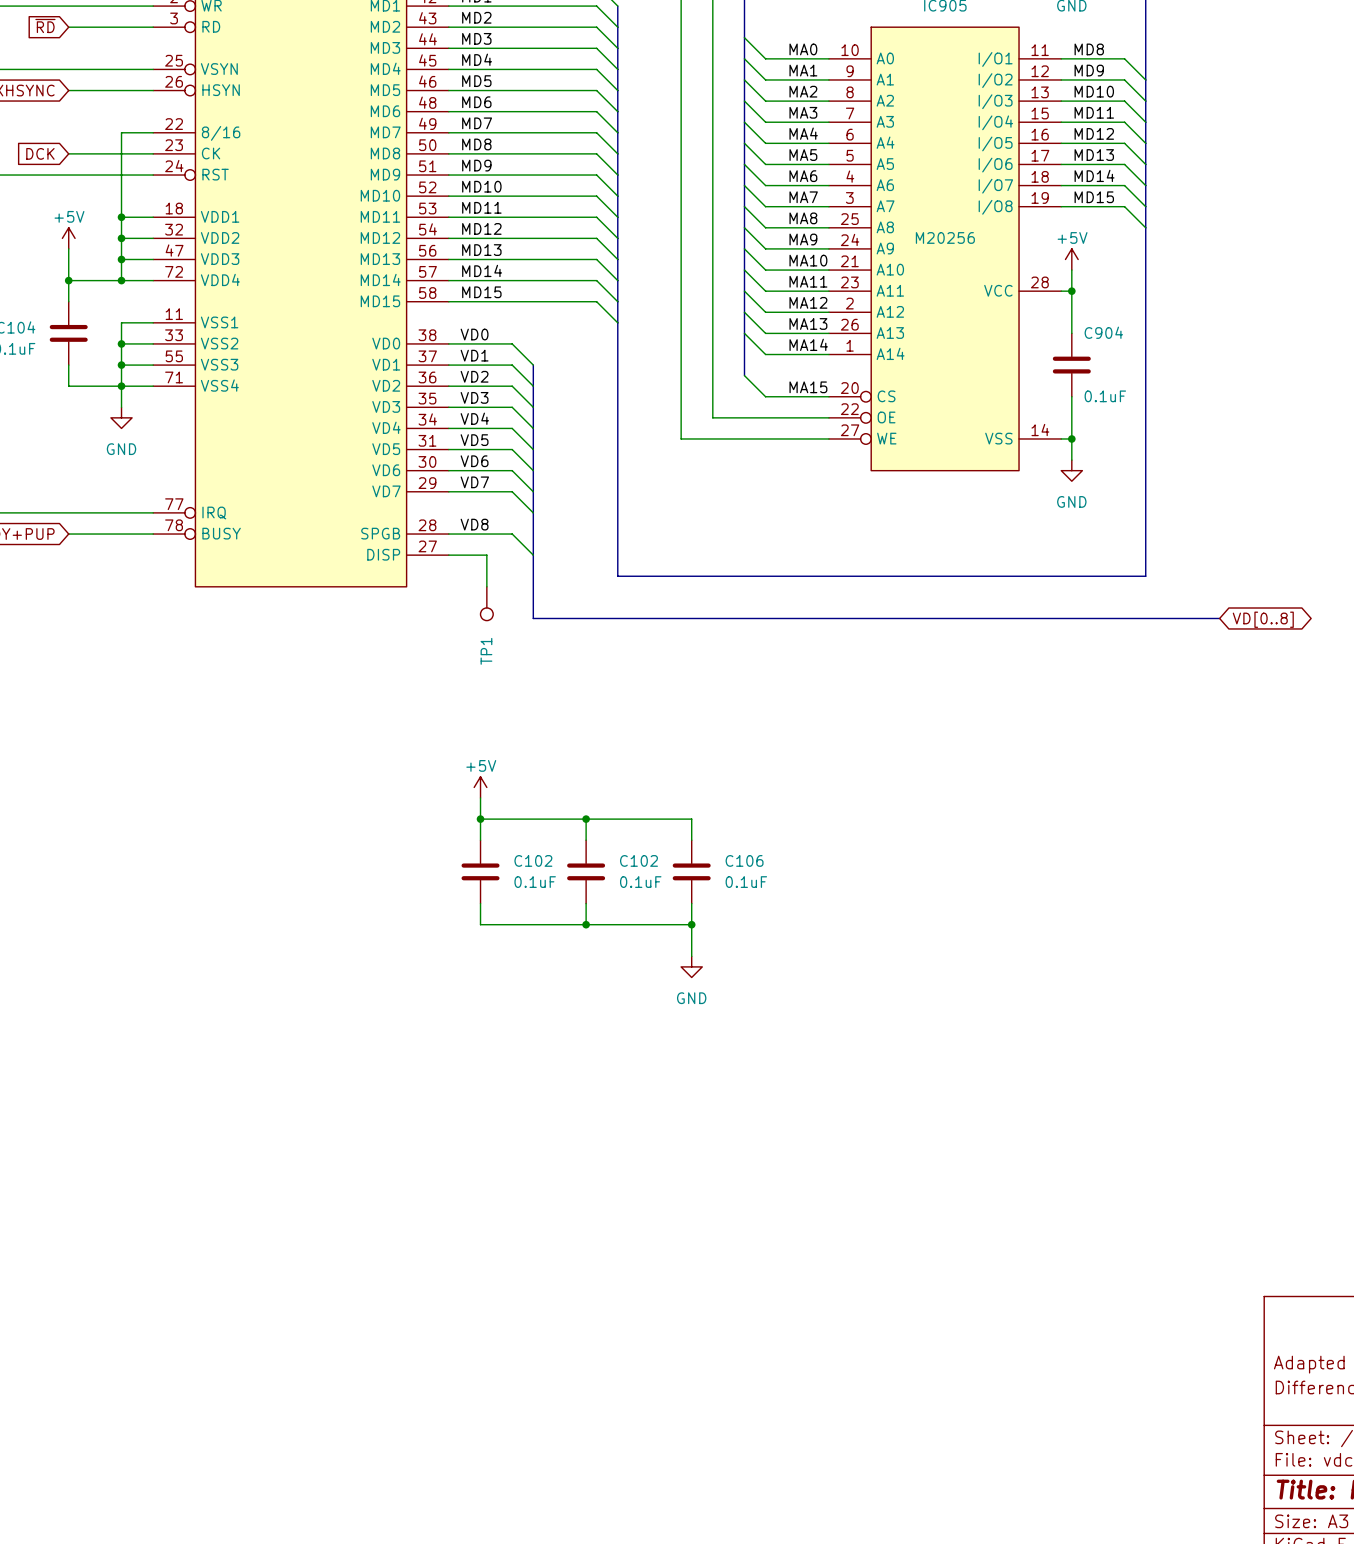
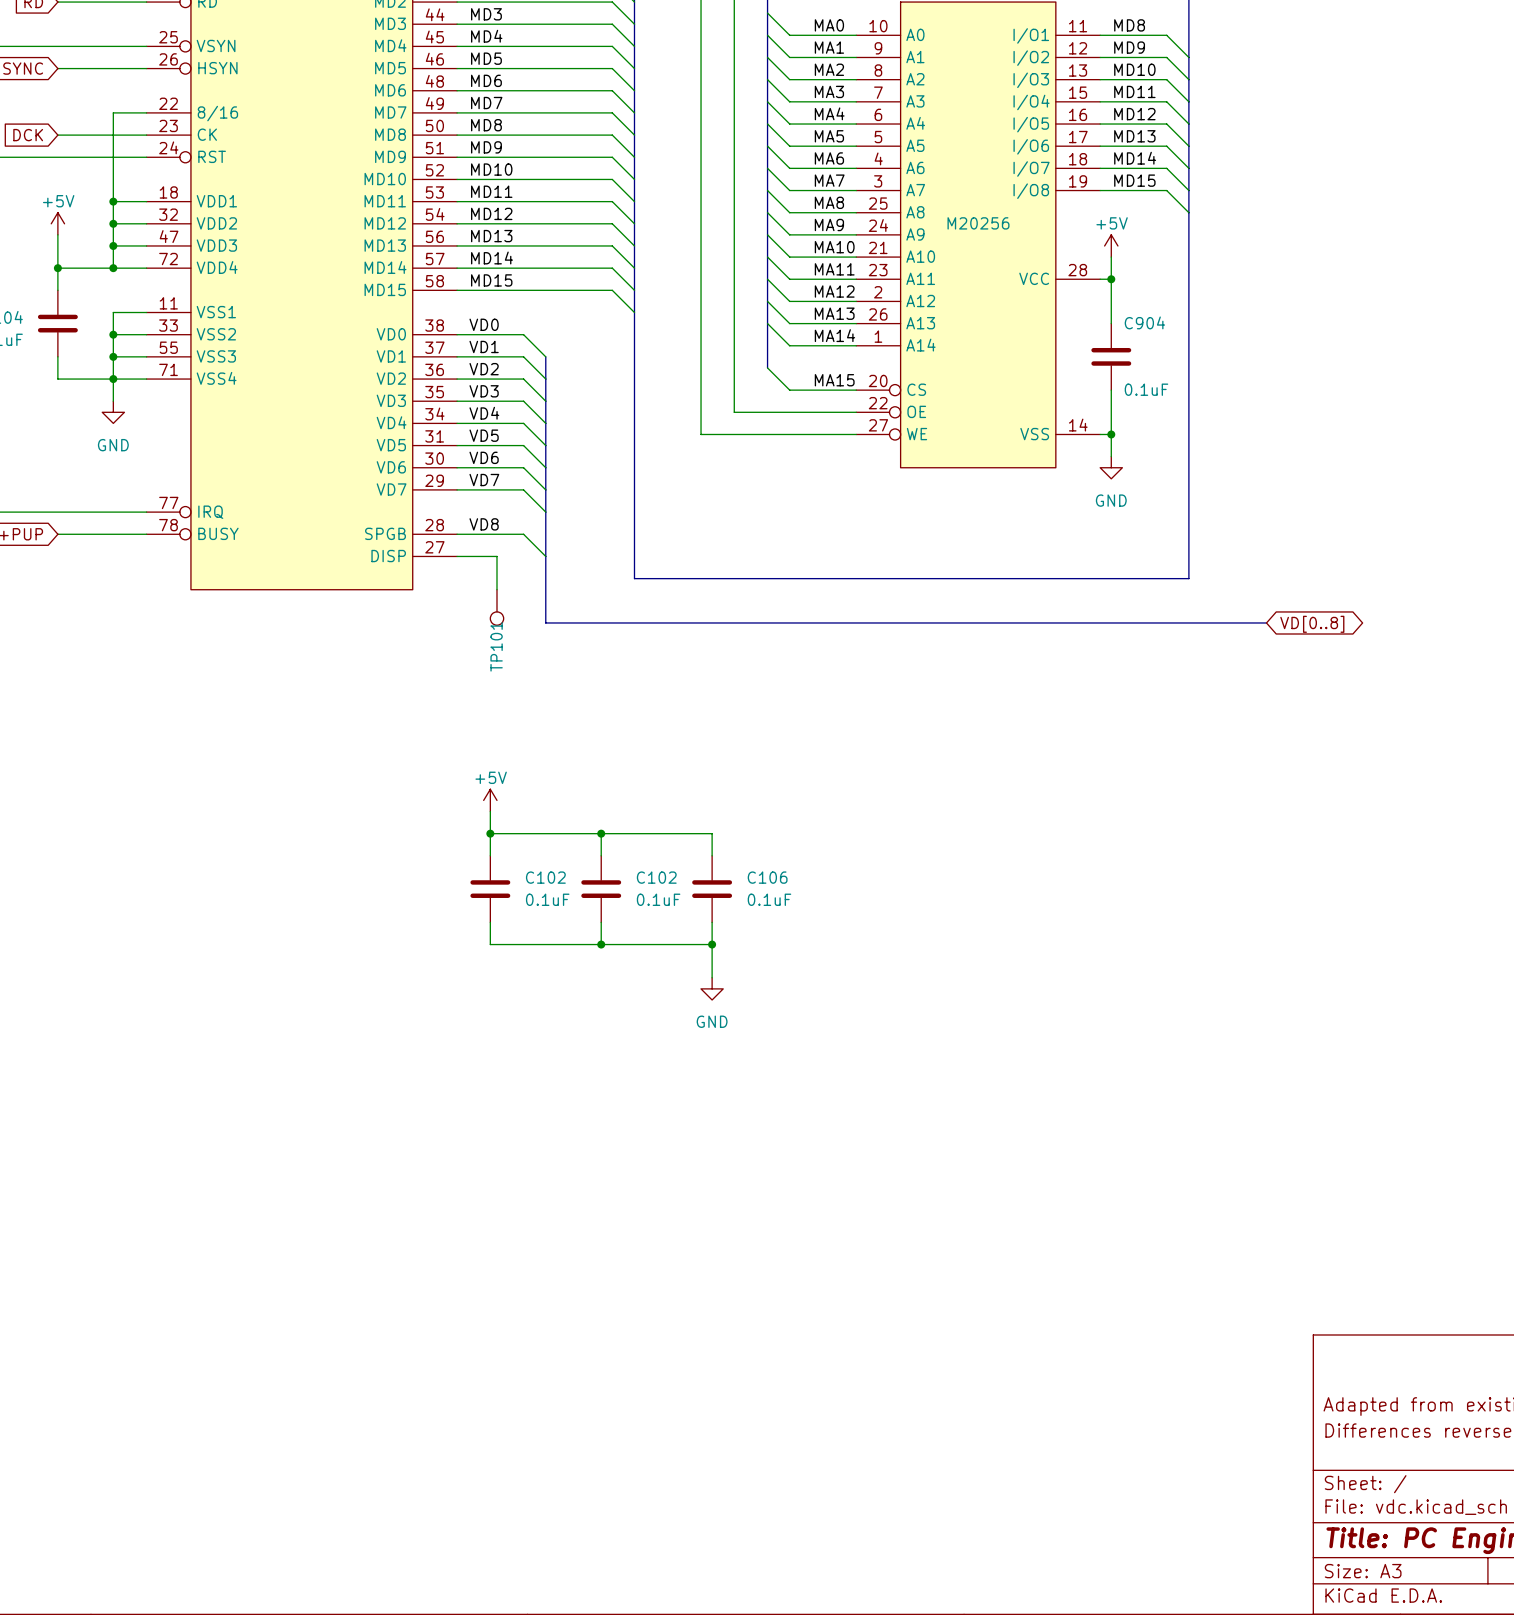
TP1 name: TP1 (486, 651) -> TP101 (496, 646)

